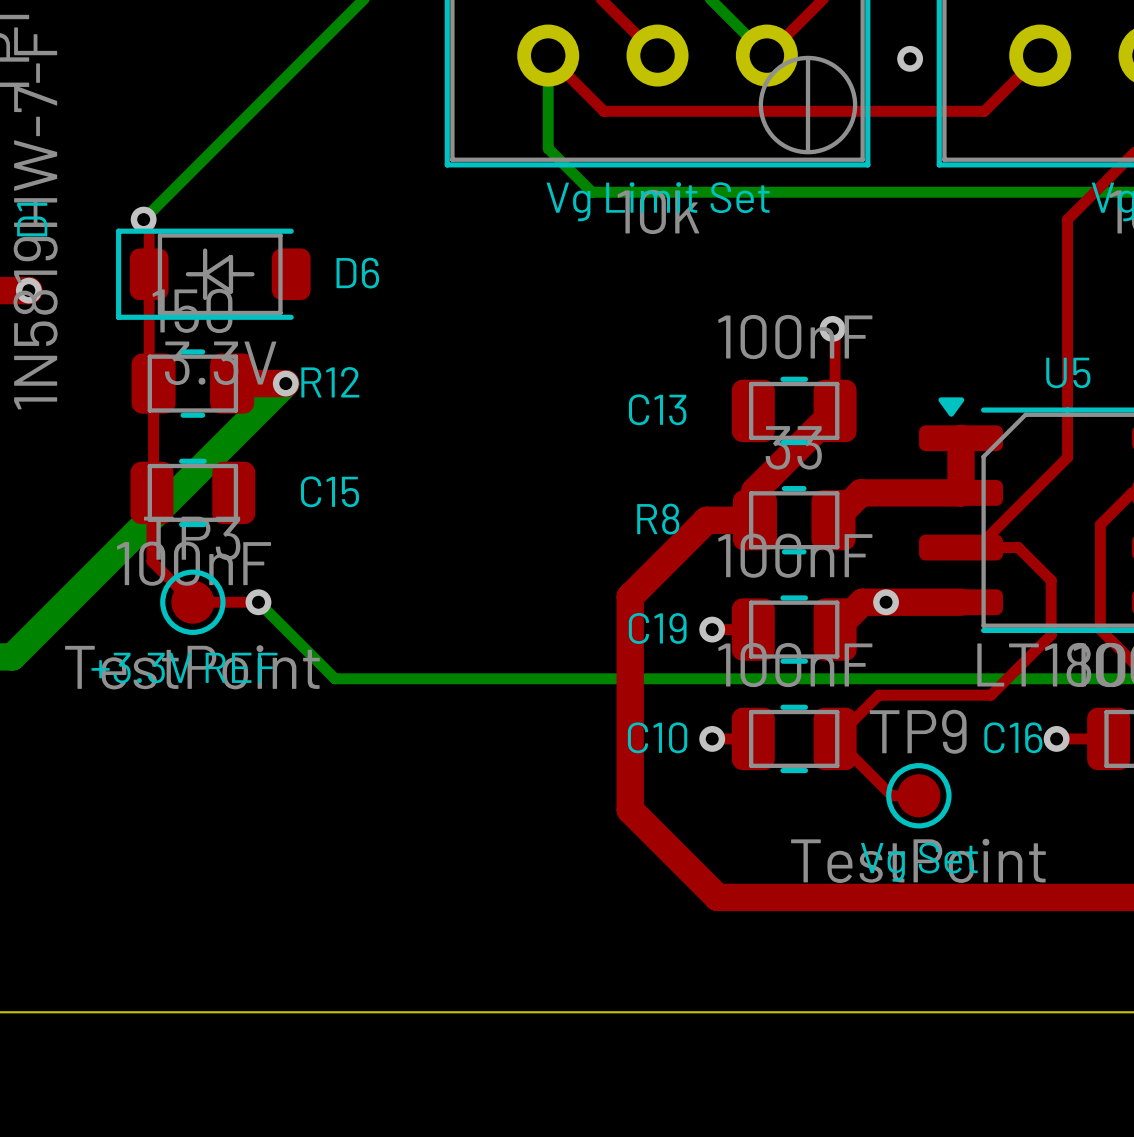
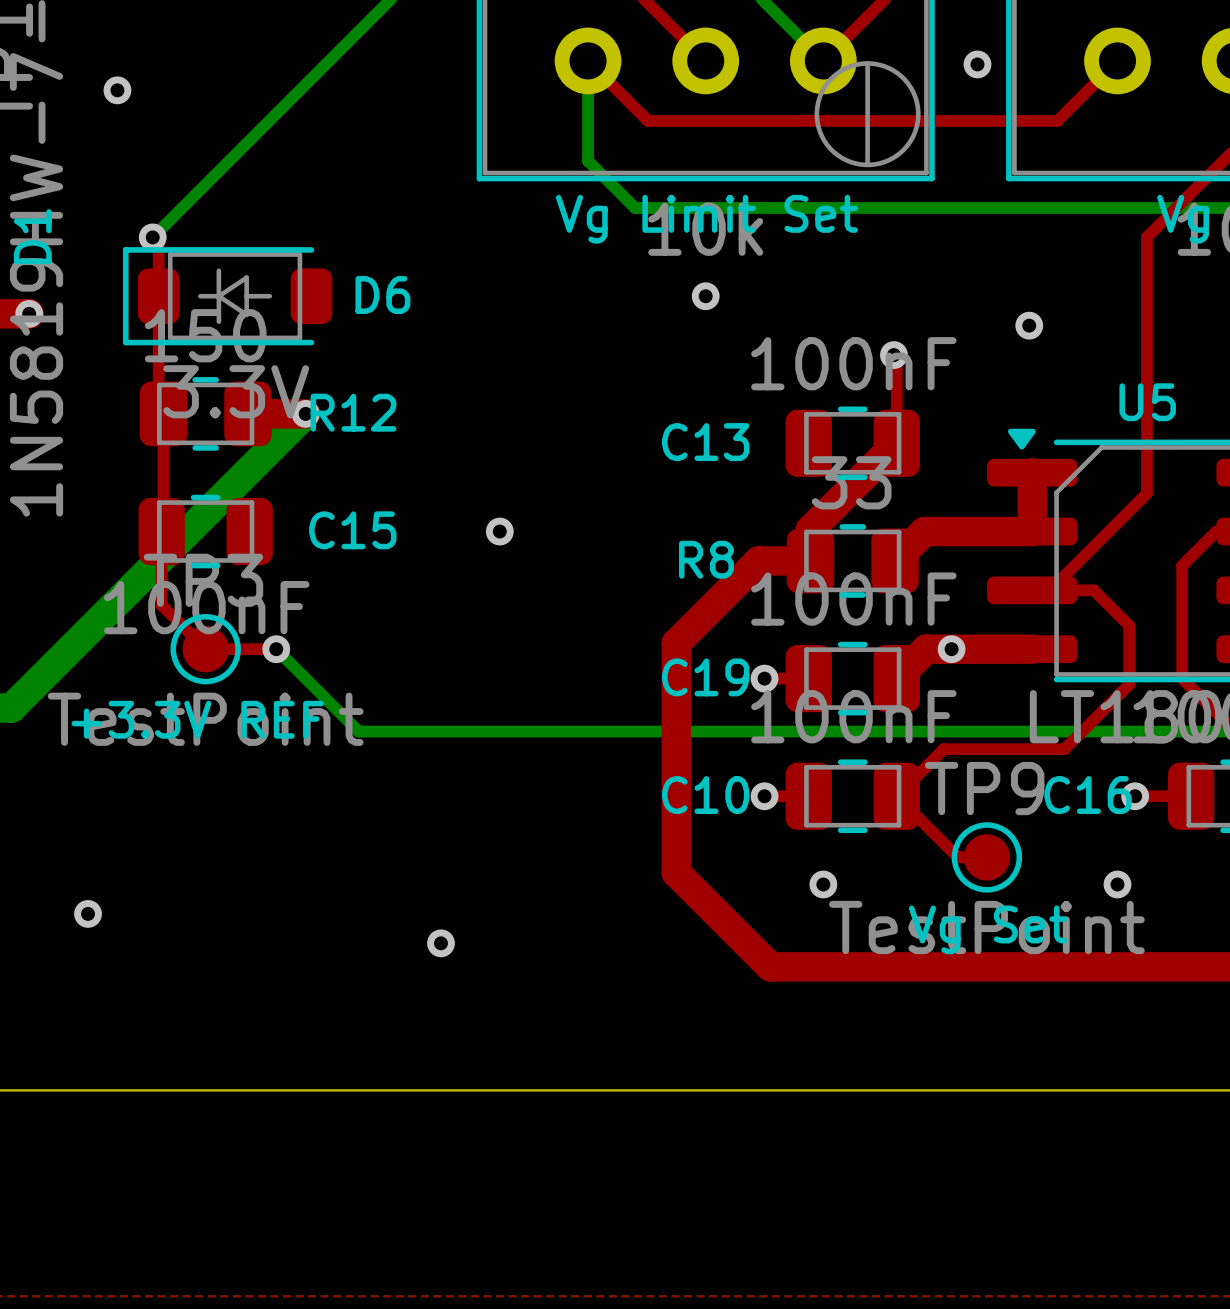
via: none -> (117, 90)
via: none -> (705, 296)
via: none -> (1029, 325)
via: none -> (499, 531)
via: none -> (823, 884)
via: none -> (1117, 884)
via: none -> (88, 913)
via: none -> (440, 943)

